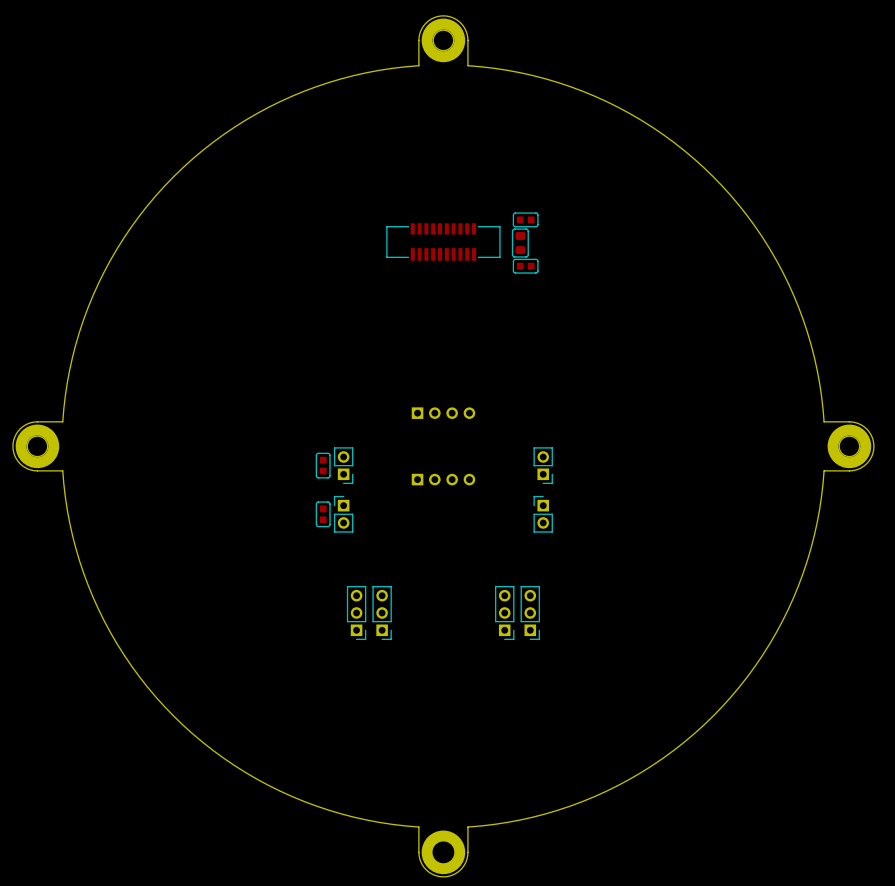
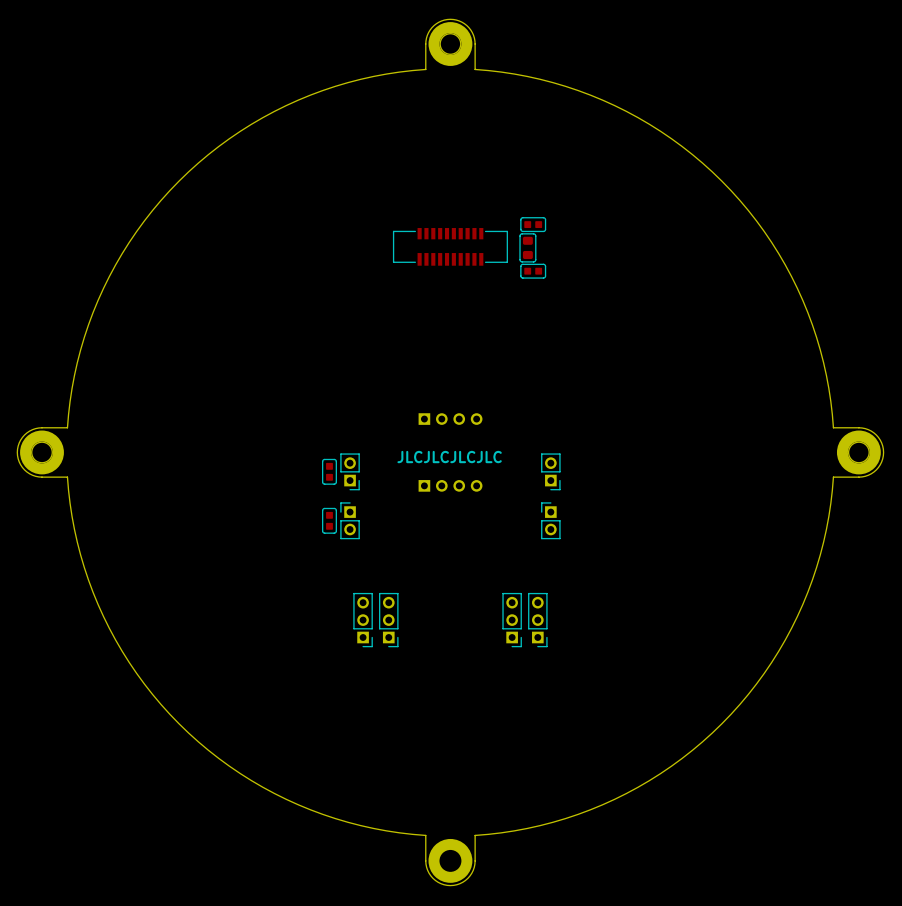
text: none -> JLCJLCJLCJLC (449, 457)

